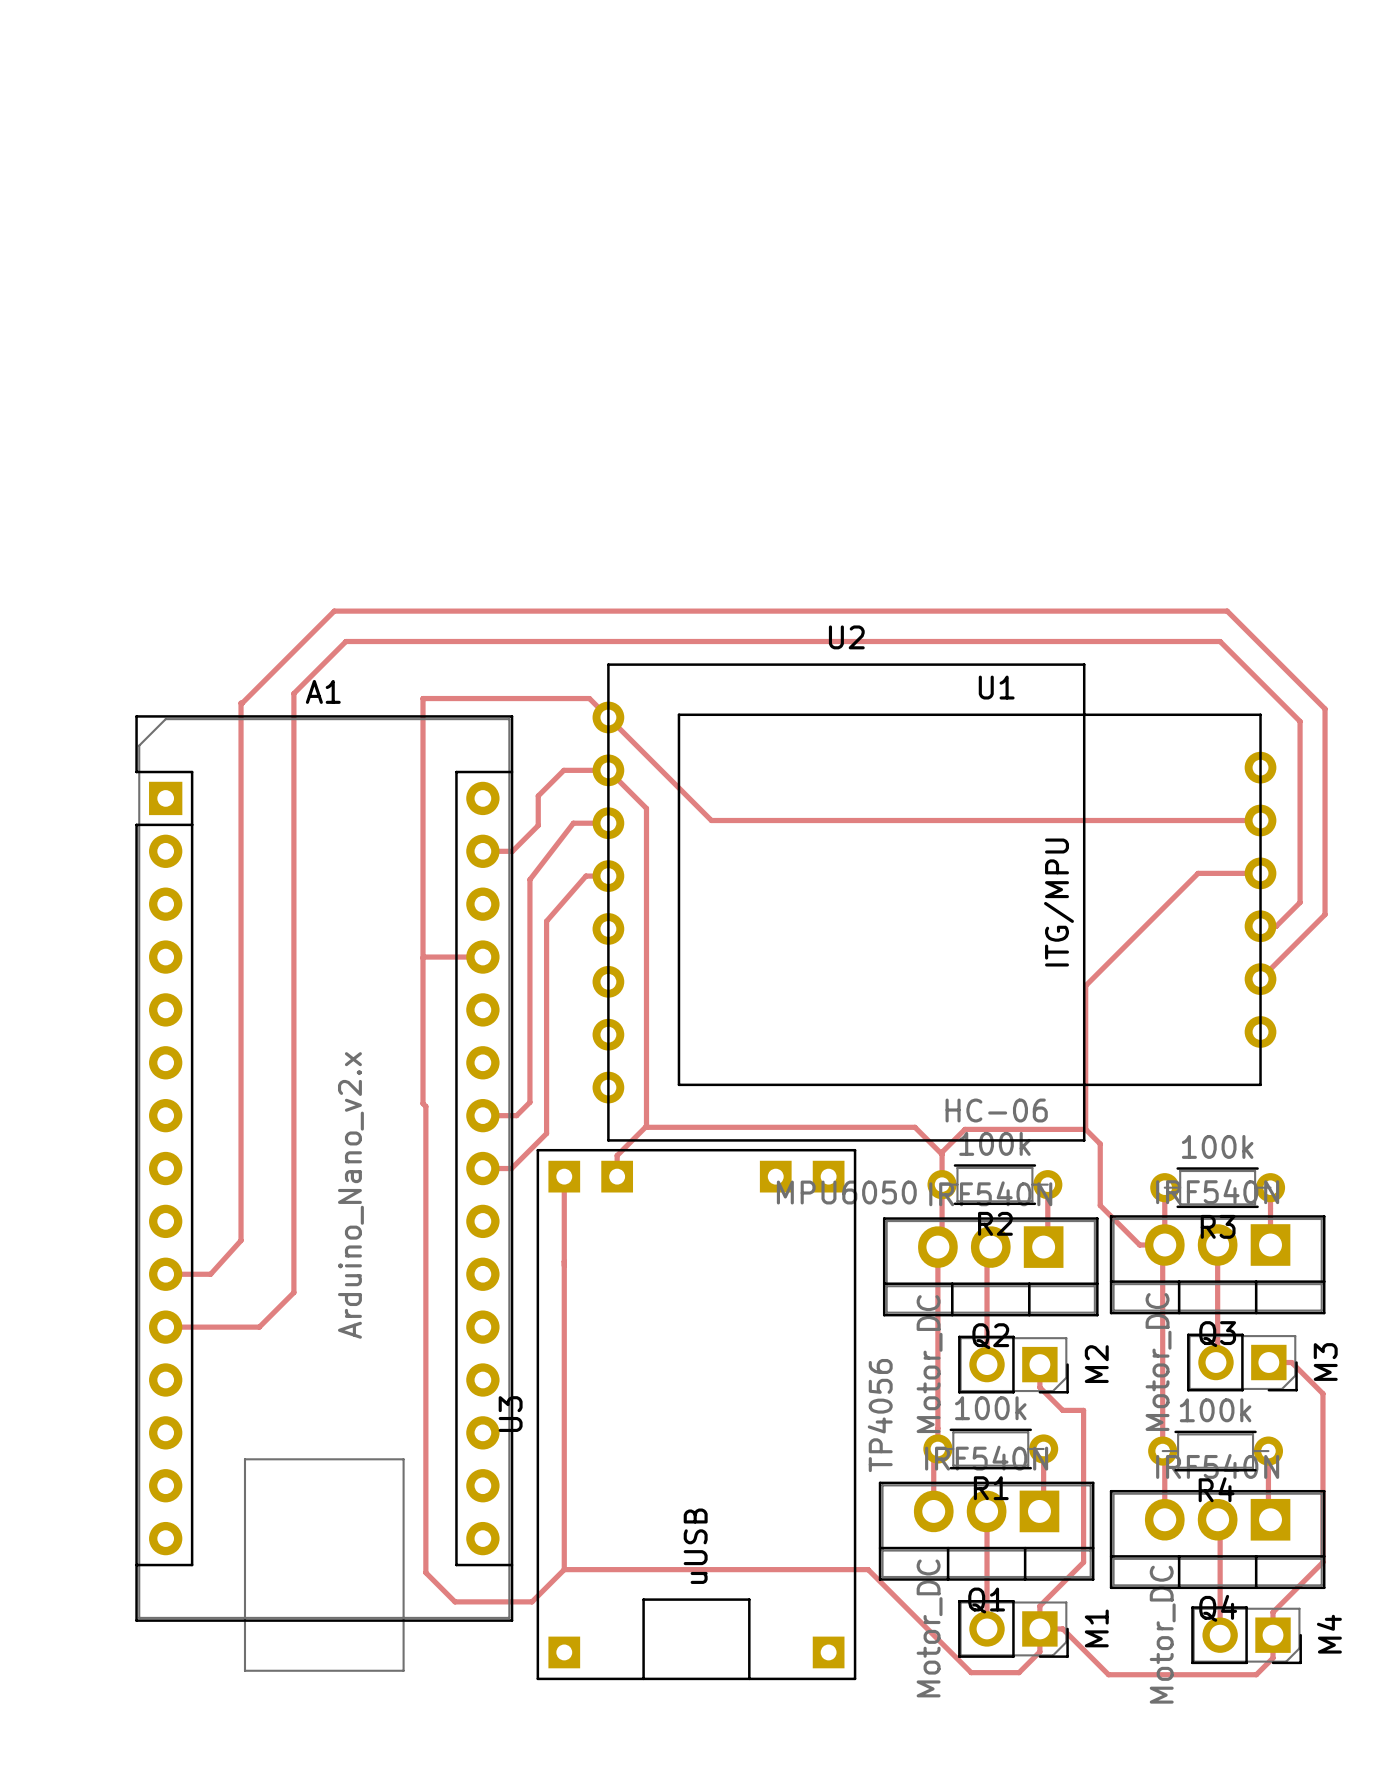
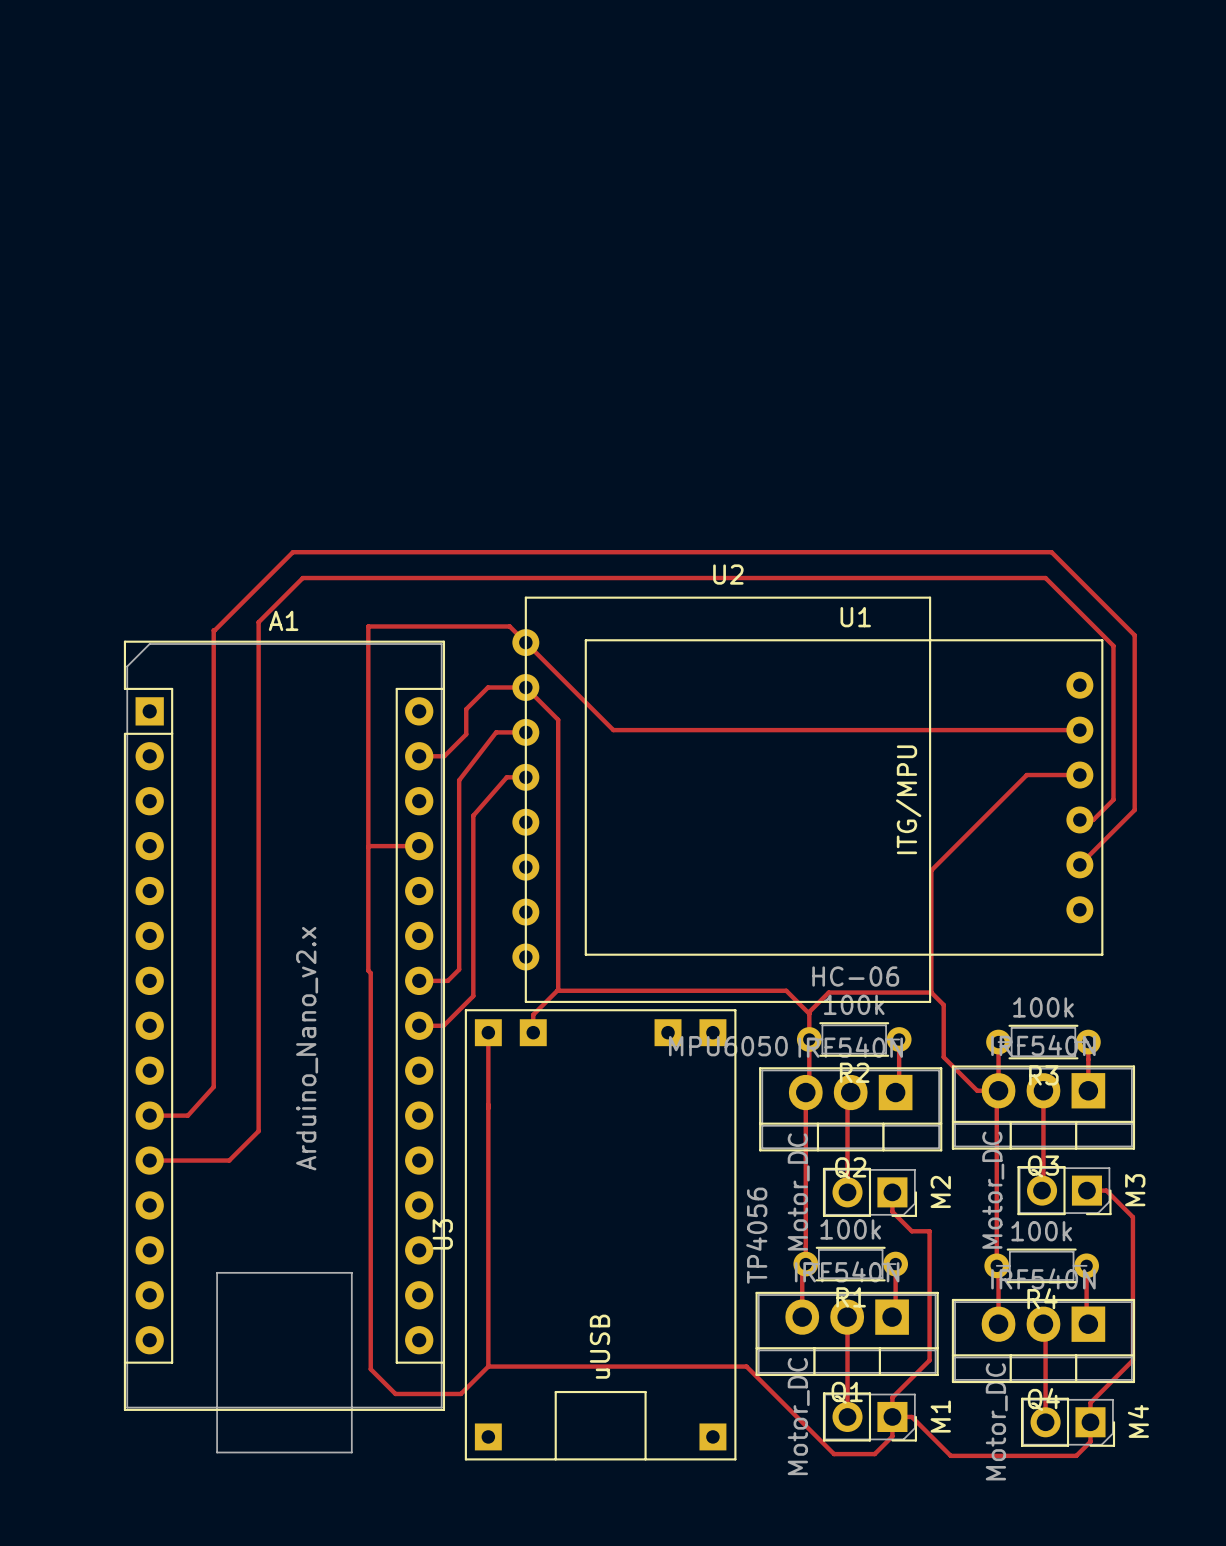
U1 footprint: [677, 713, 1277, 1087] -> [584, 639, 1104, 956]

